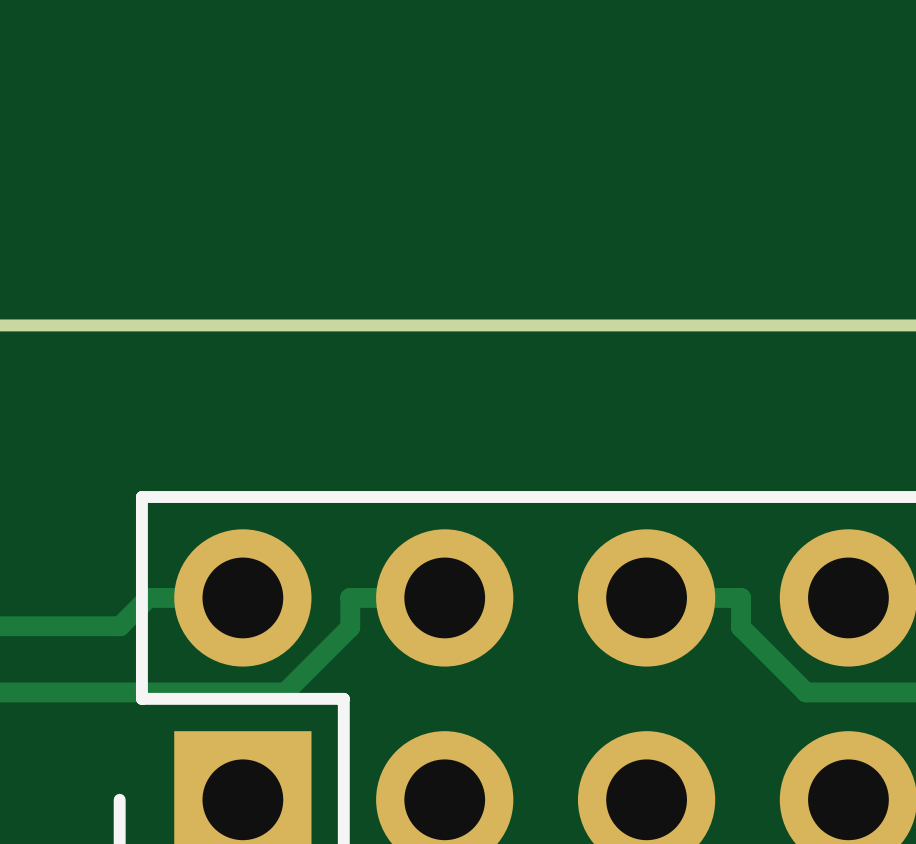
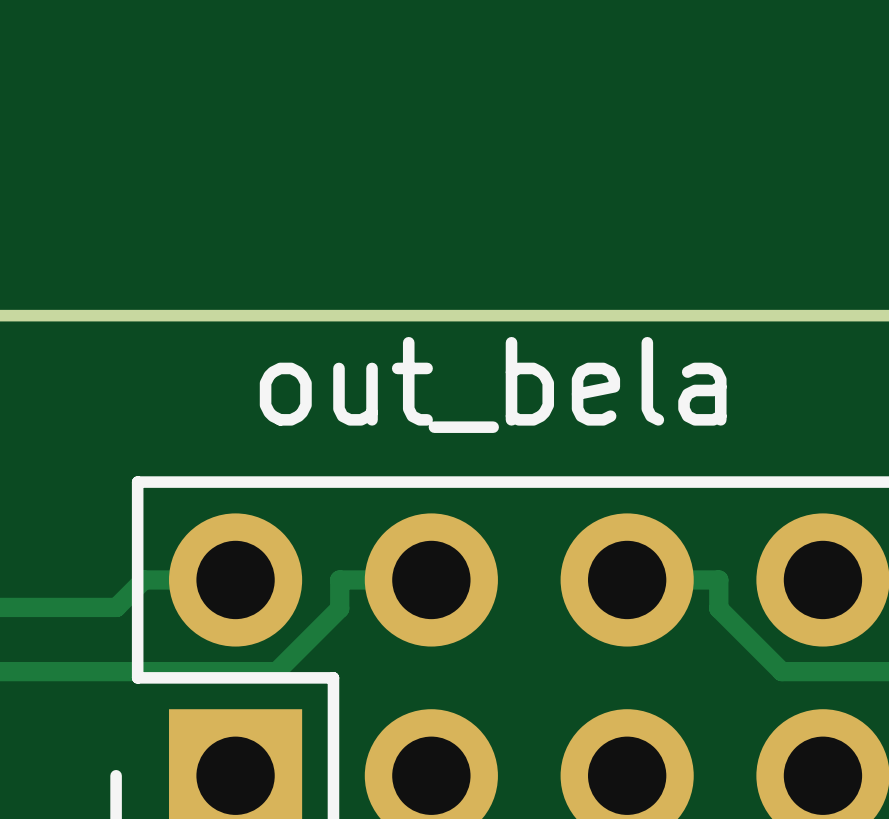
part value: none -> out_bela (493, 384)

